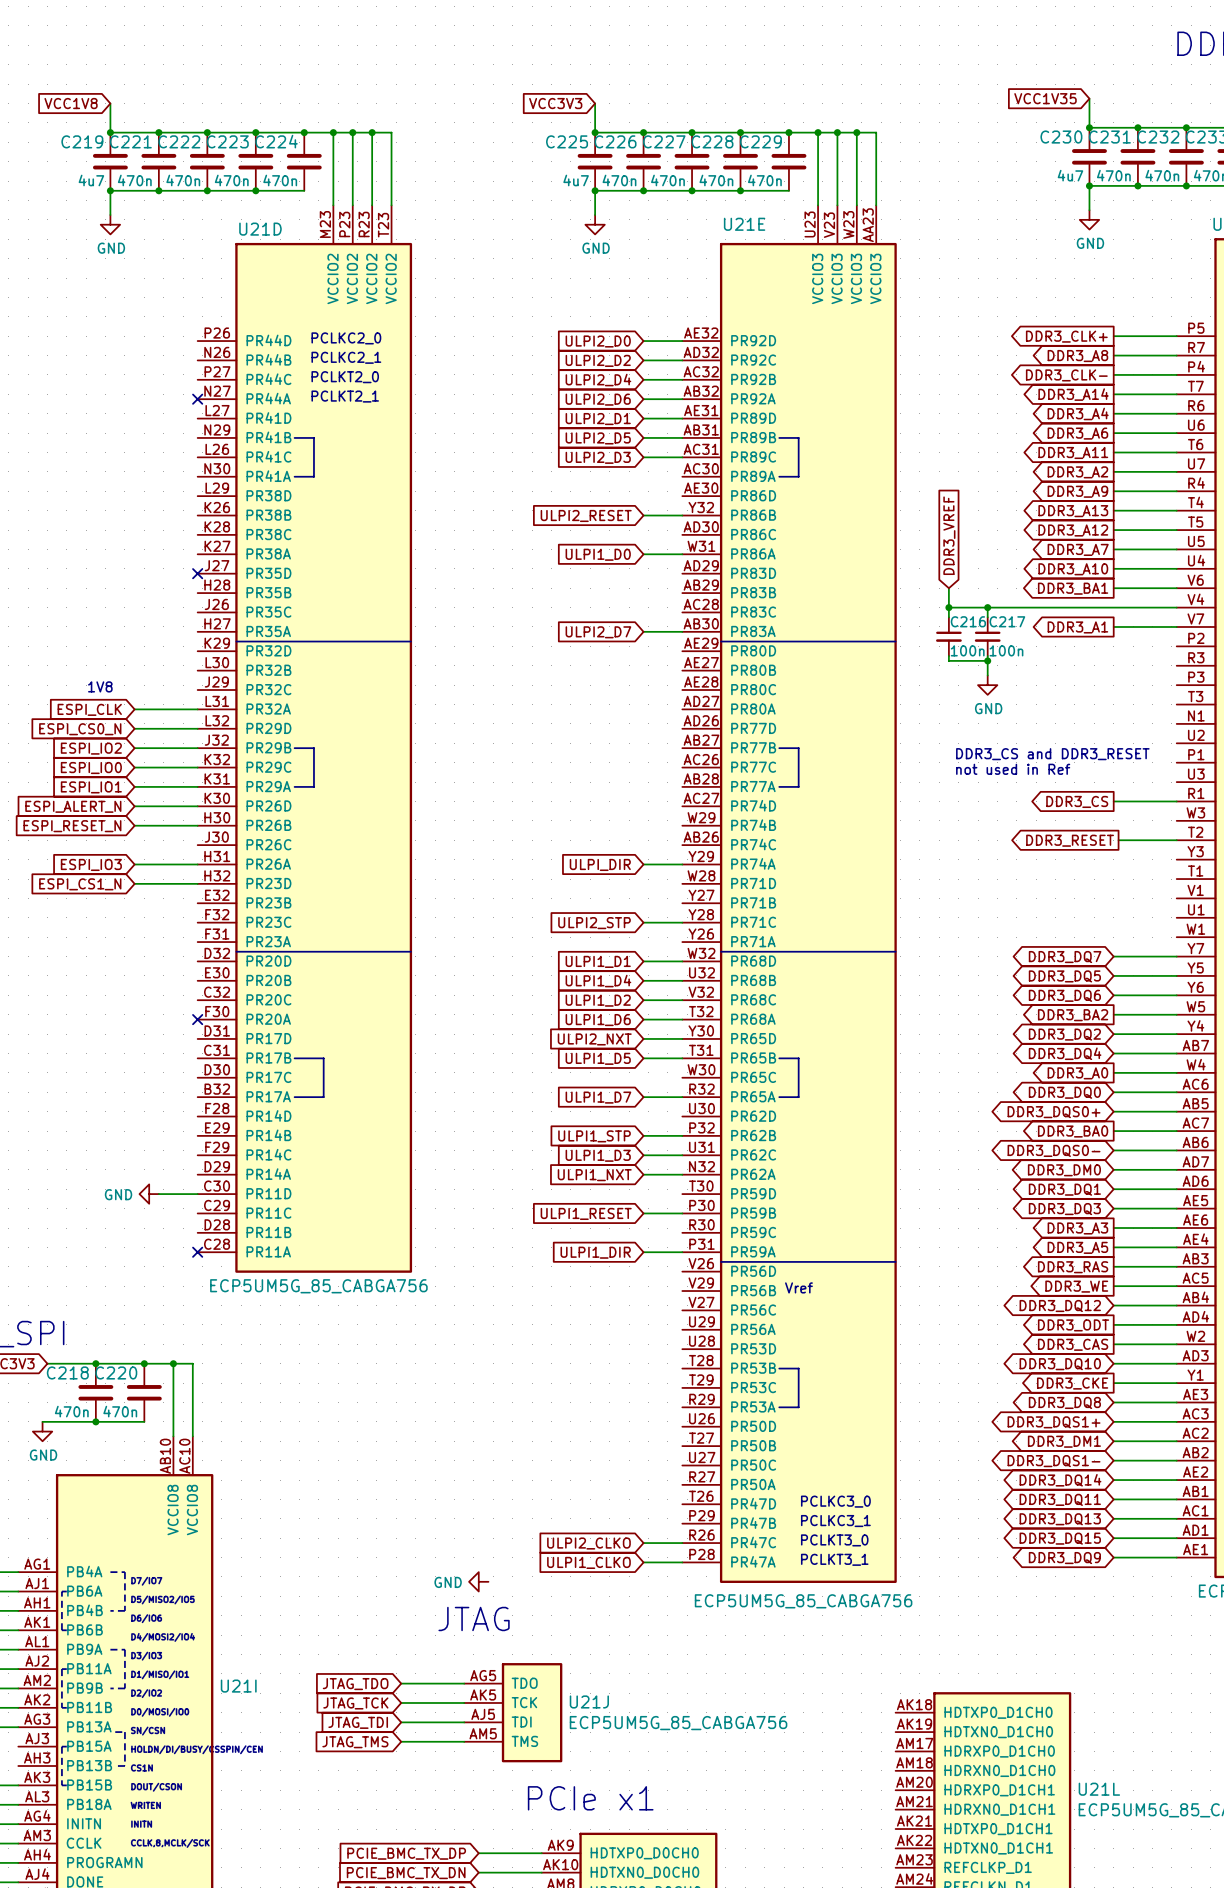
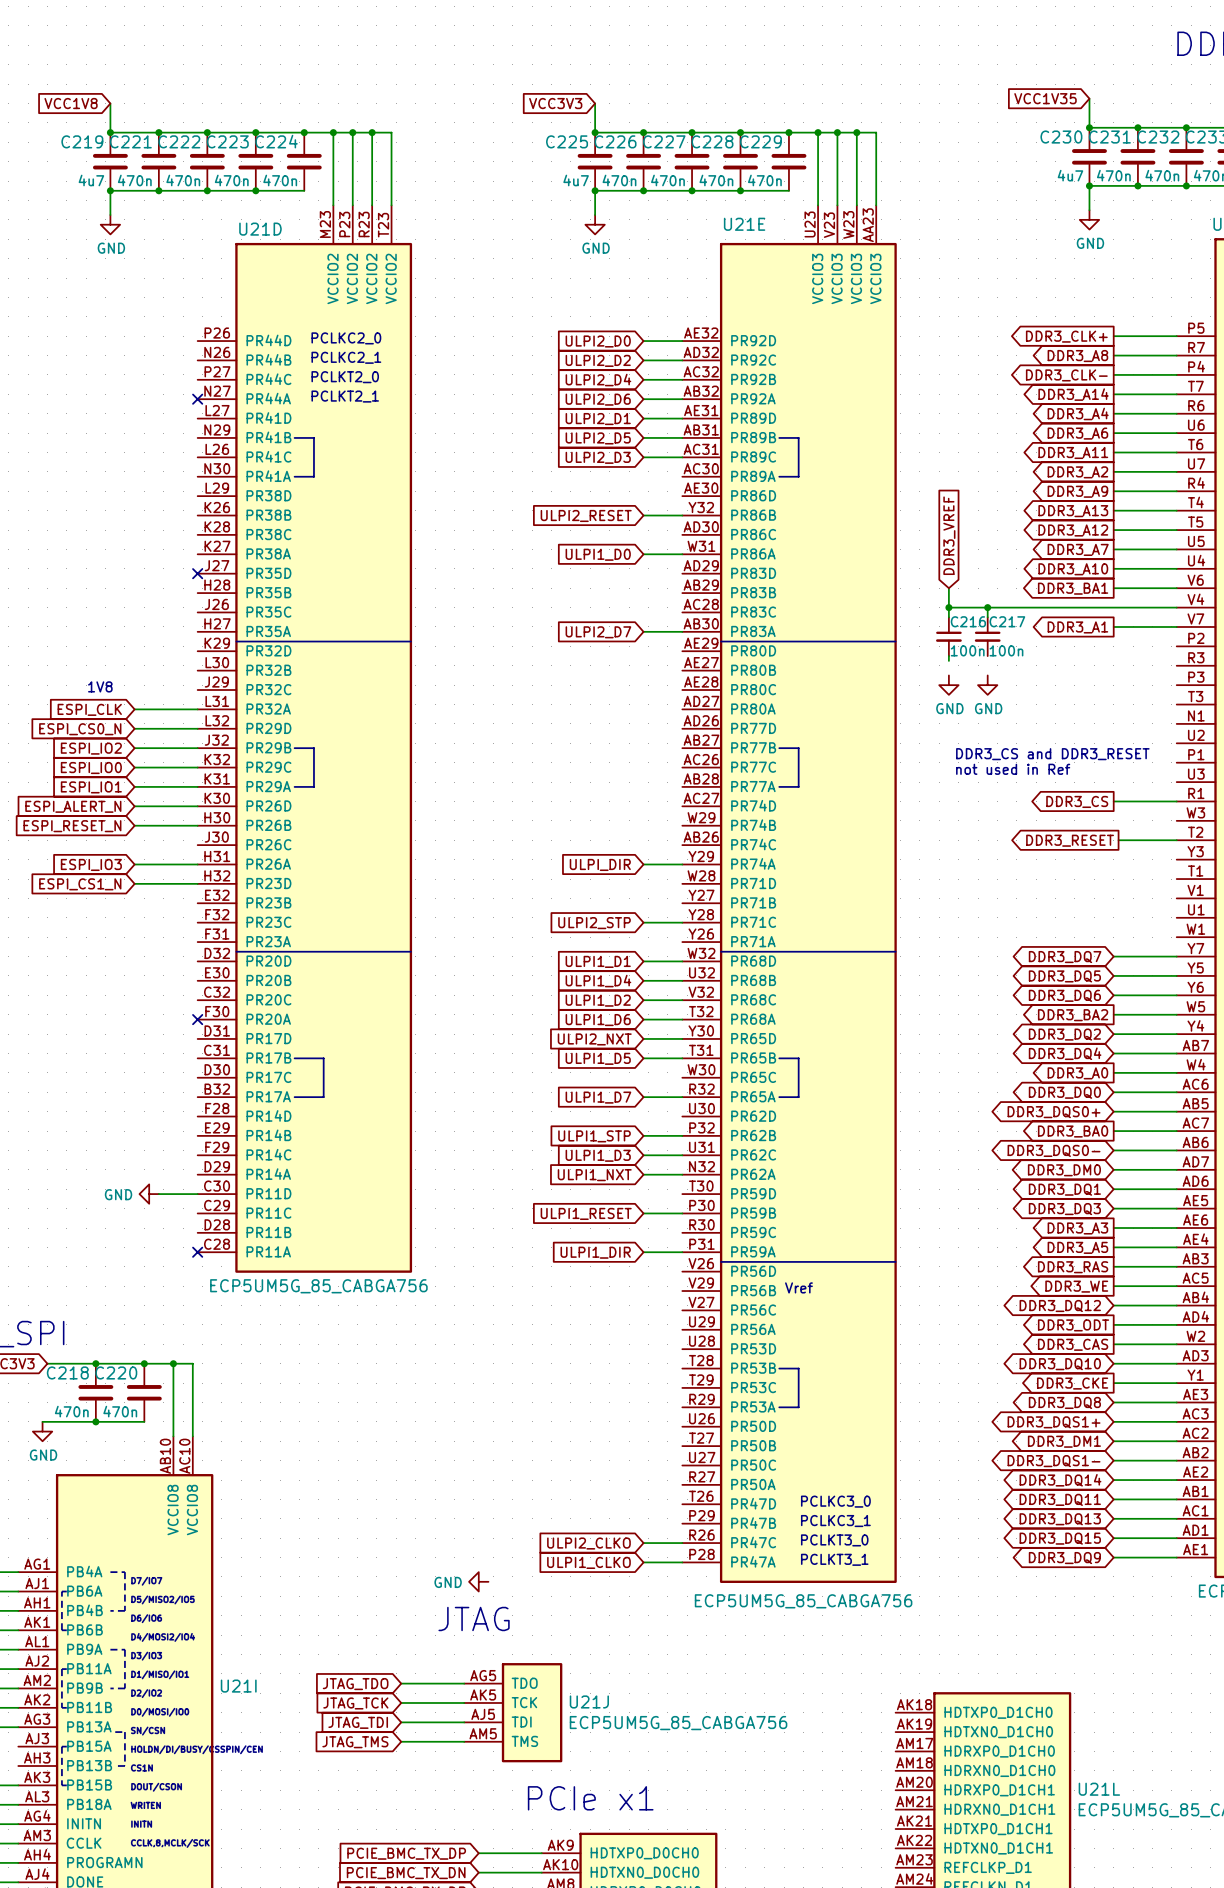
wire: (987, 656) (987, 675) -> none
wire: (948, 660) (987, 660) -> none
junction: (987, 660) -> none
power symbol: none -> GND (948, 685)

